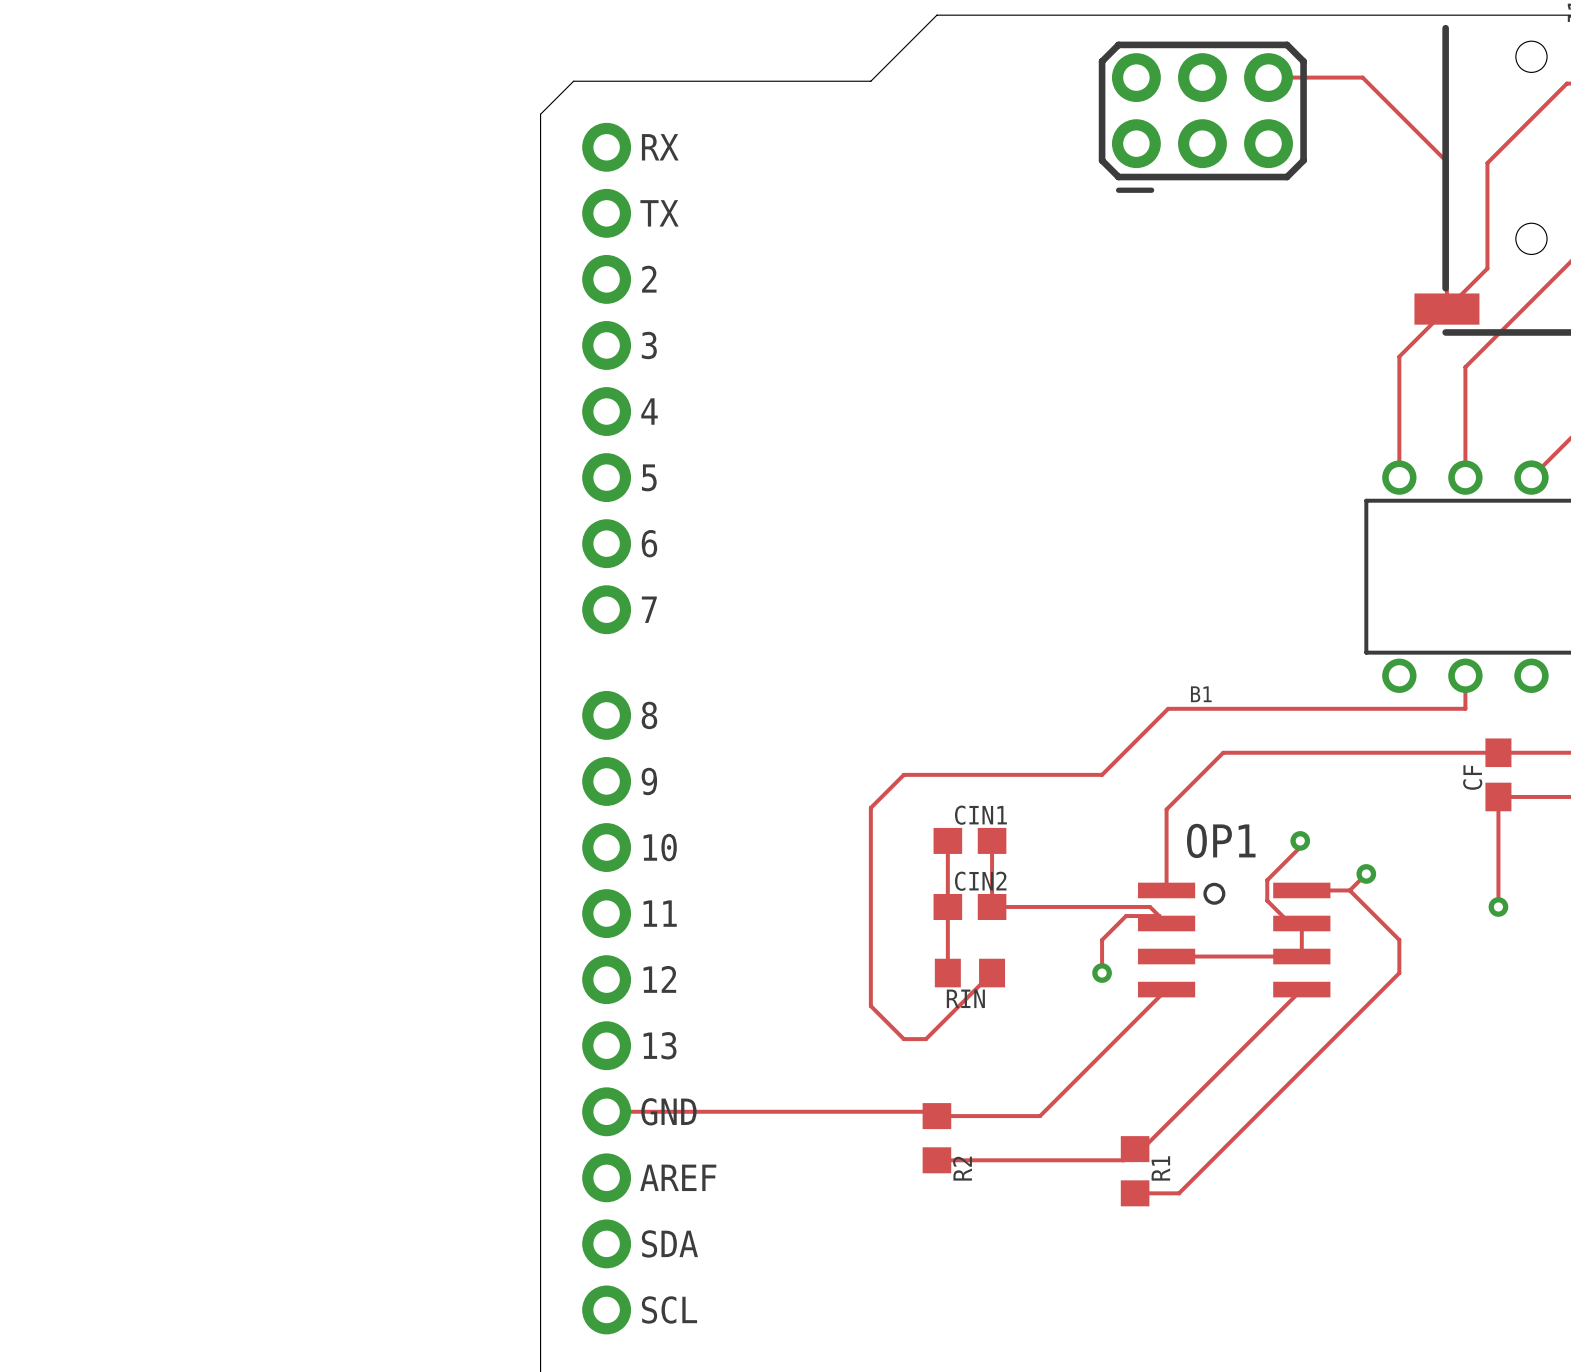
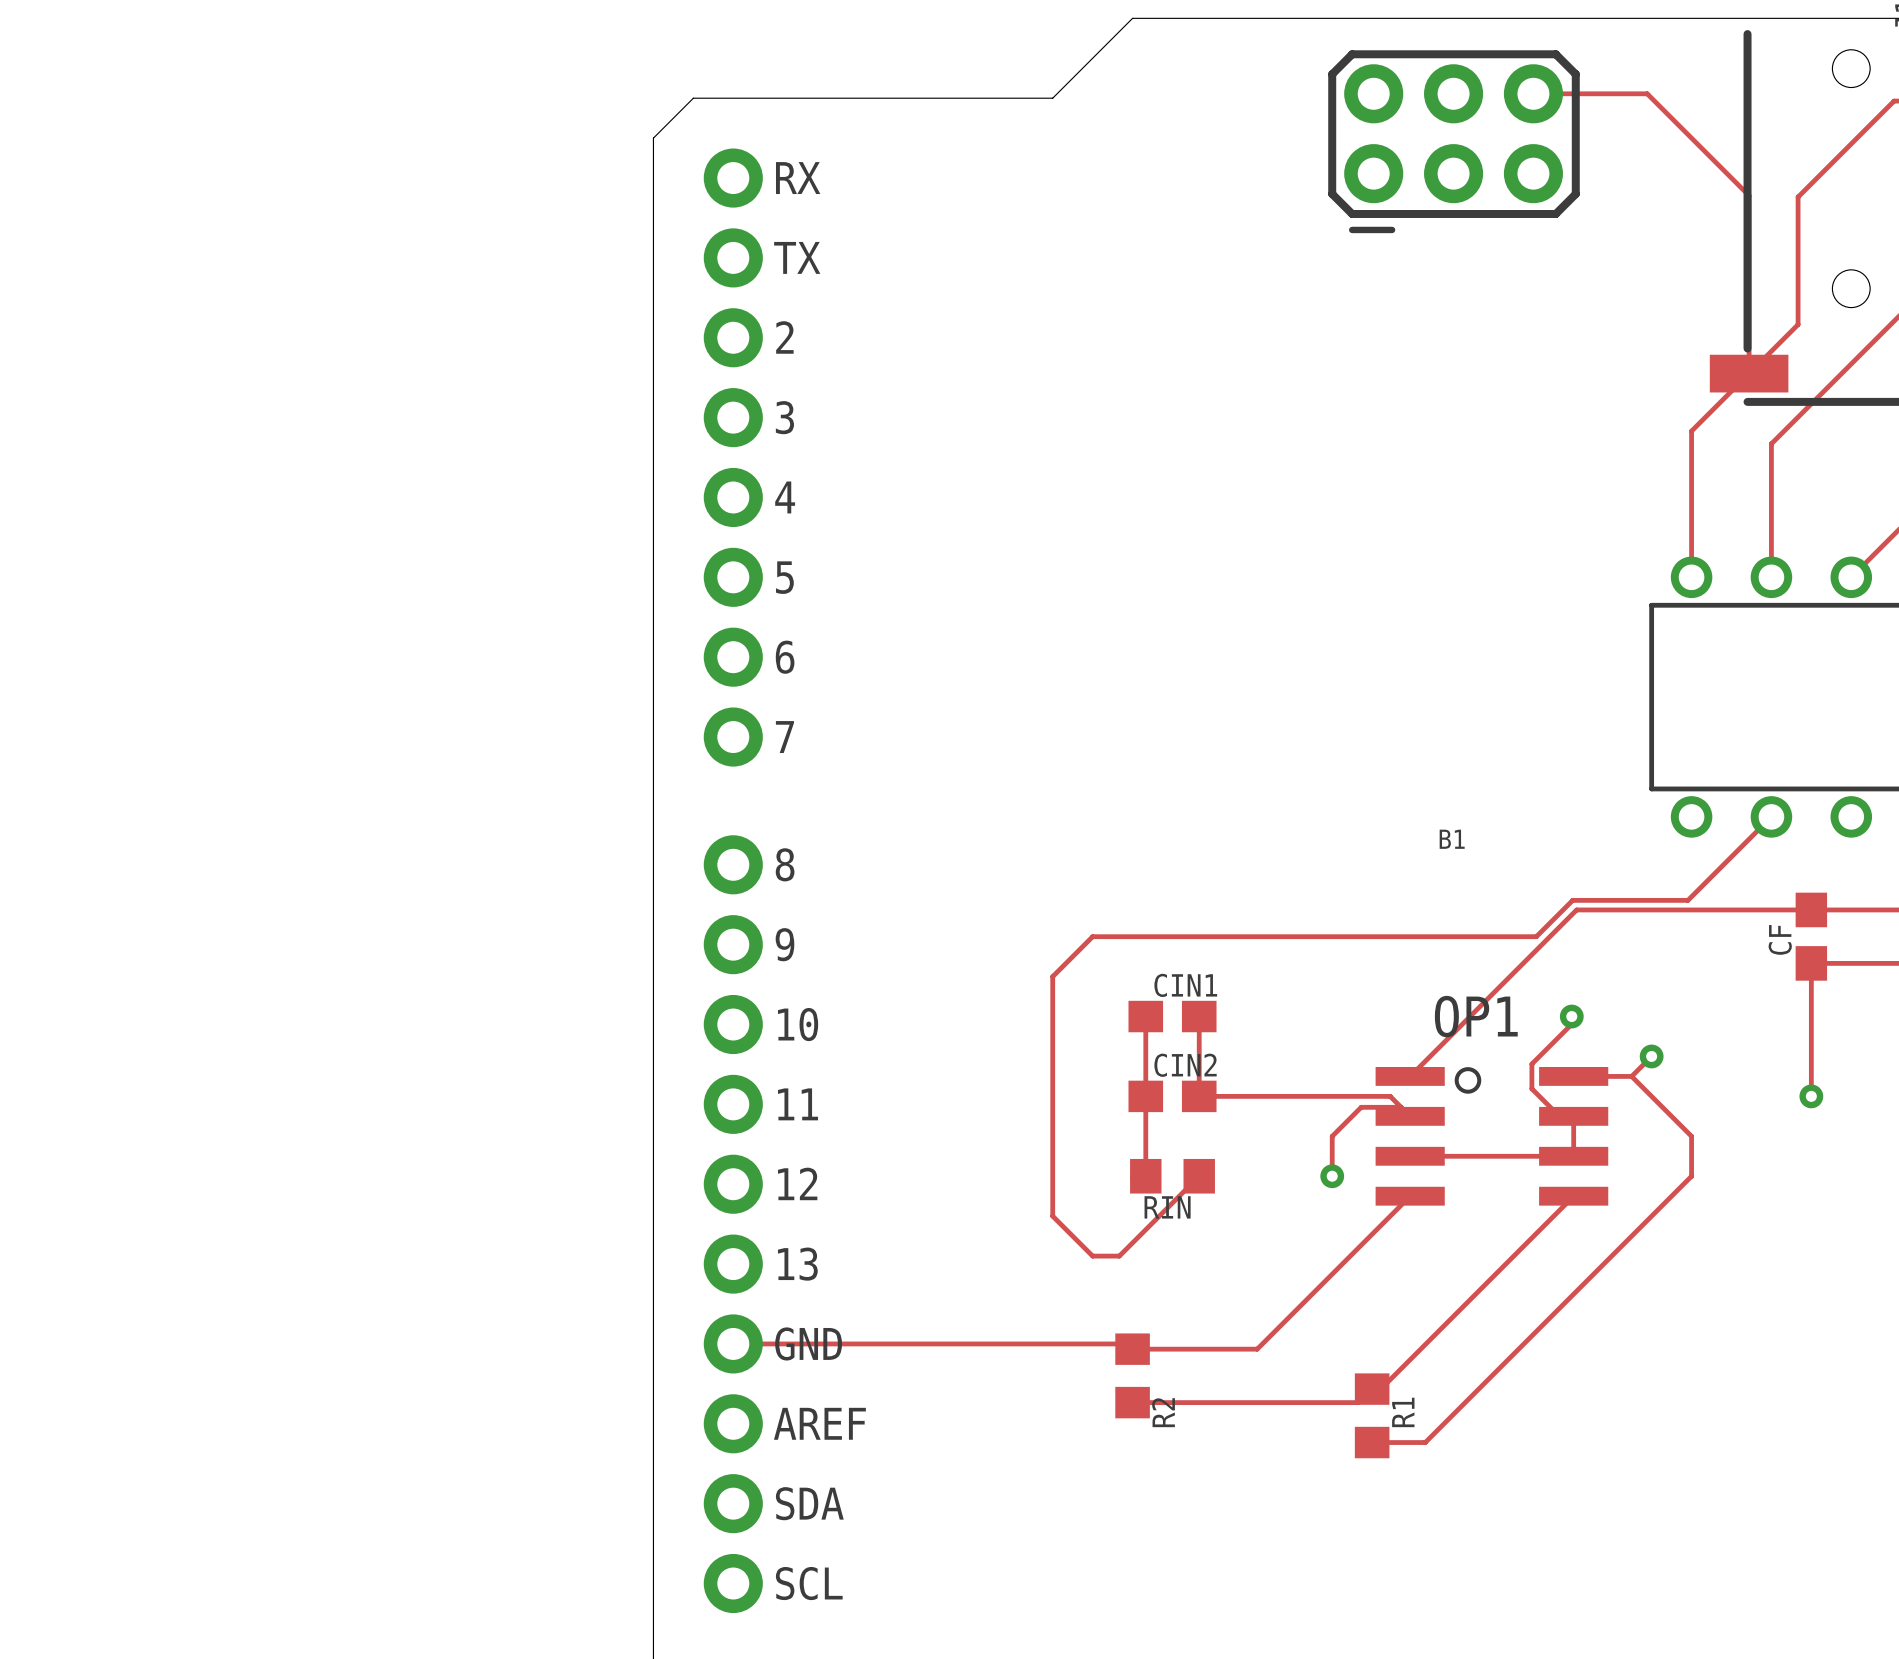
track: (1465, 675) (1465, 708) (1168, 708) (1102, 774) -> (1771, 816) (1687, 900) (1572, 900) (1536, 936) (1332, 936)
track: (1304, 752) (1223, 752) (1166, 809) (1166, 890) -> (1576, 909) (1410, 1076)

